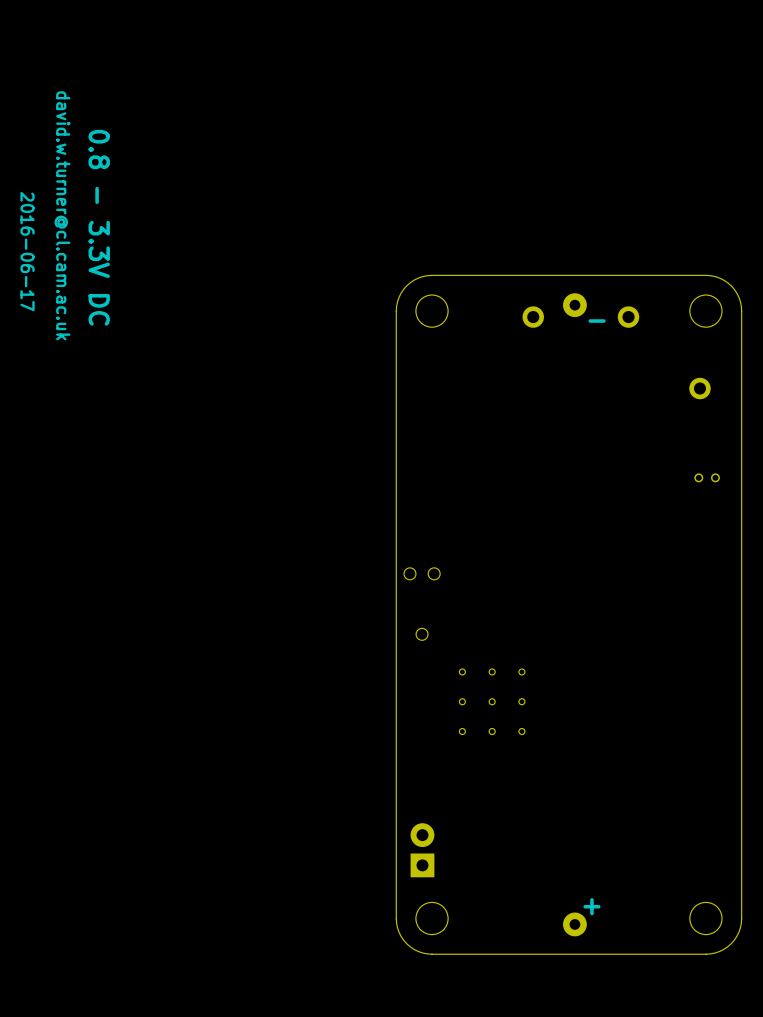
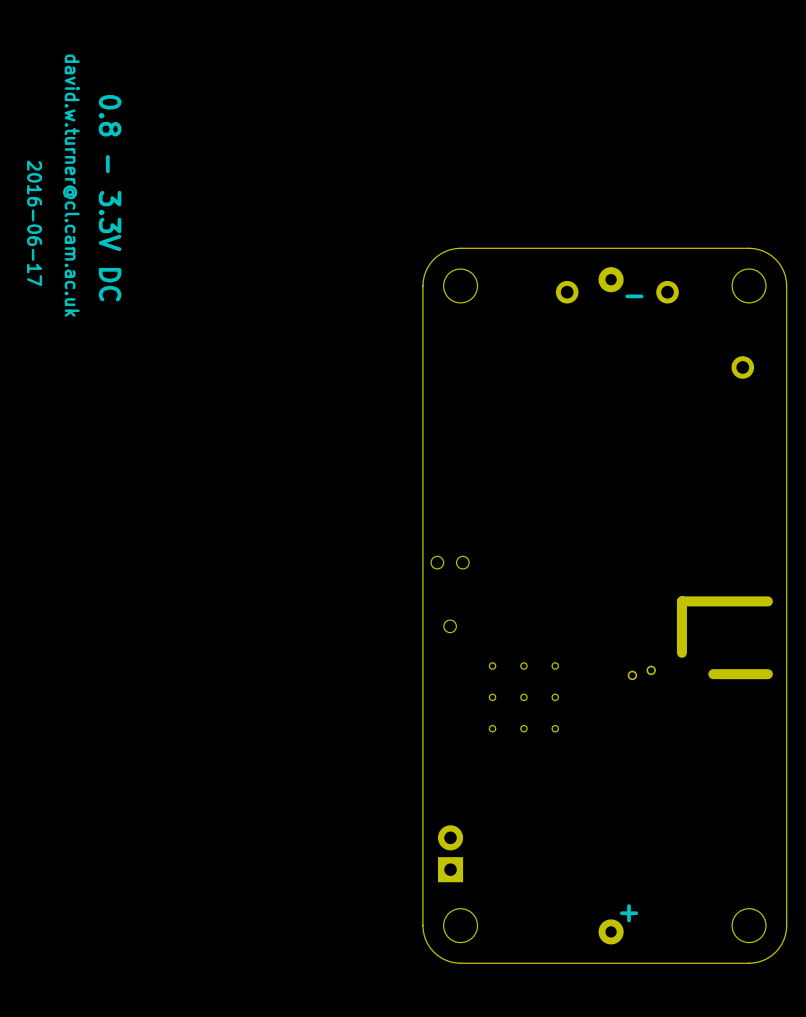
part: (698, 477) -> none
part: (715, 477) -> none
board edge: none -> (767, 601) (681, 601) (681, 652)
part: none -> (651, 670)
board edge: none -> (767, 674) (713, 674)
part: none -> (632, 675)

